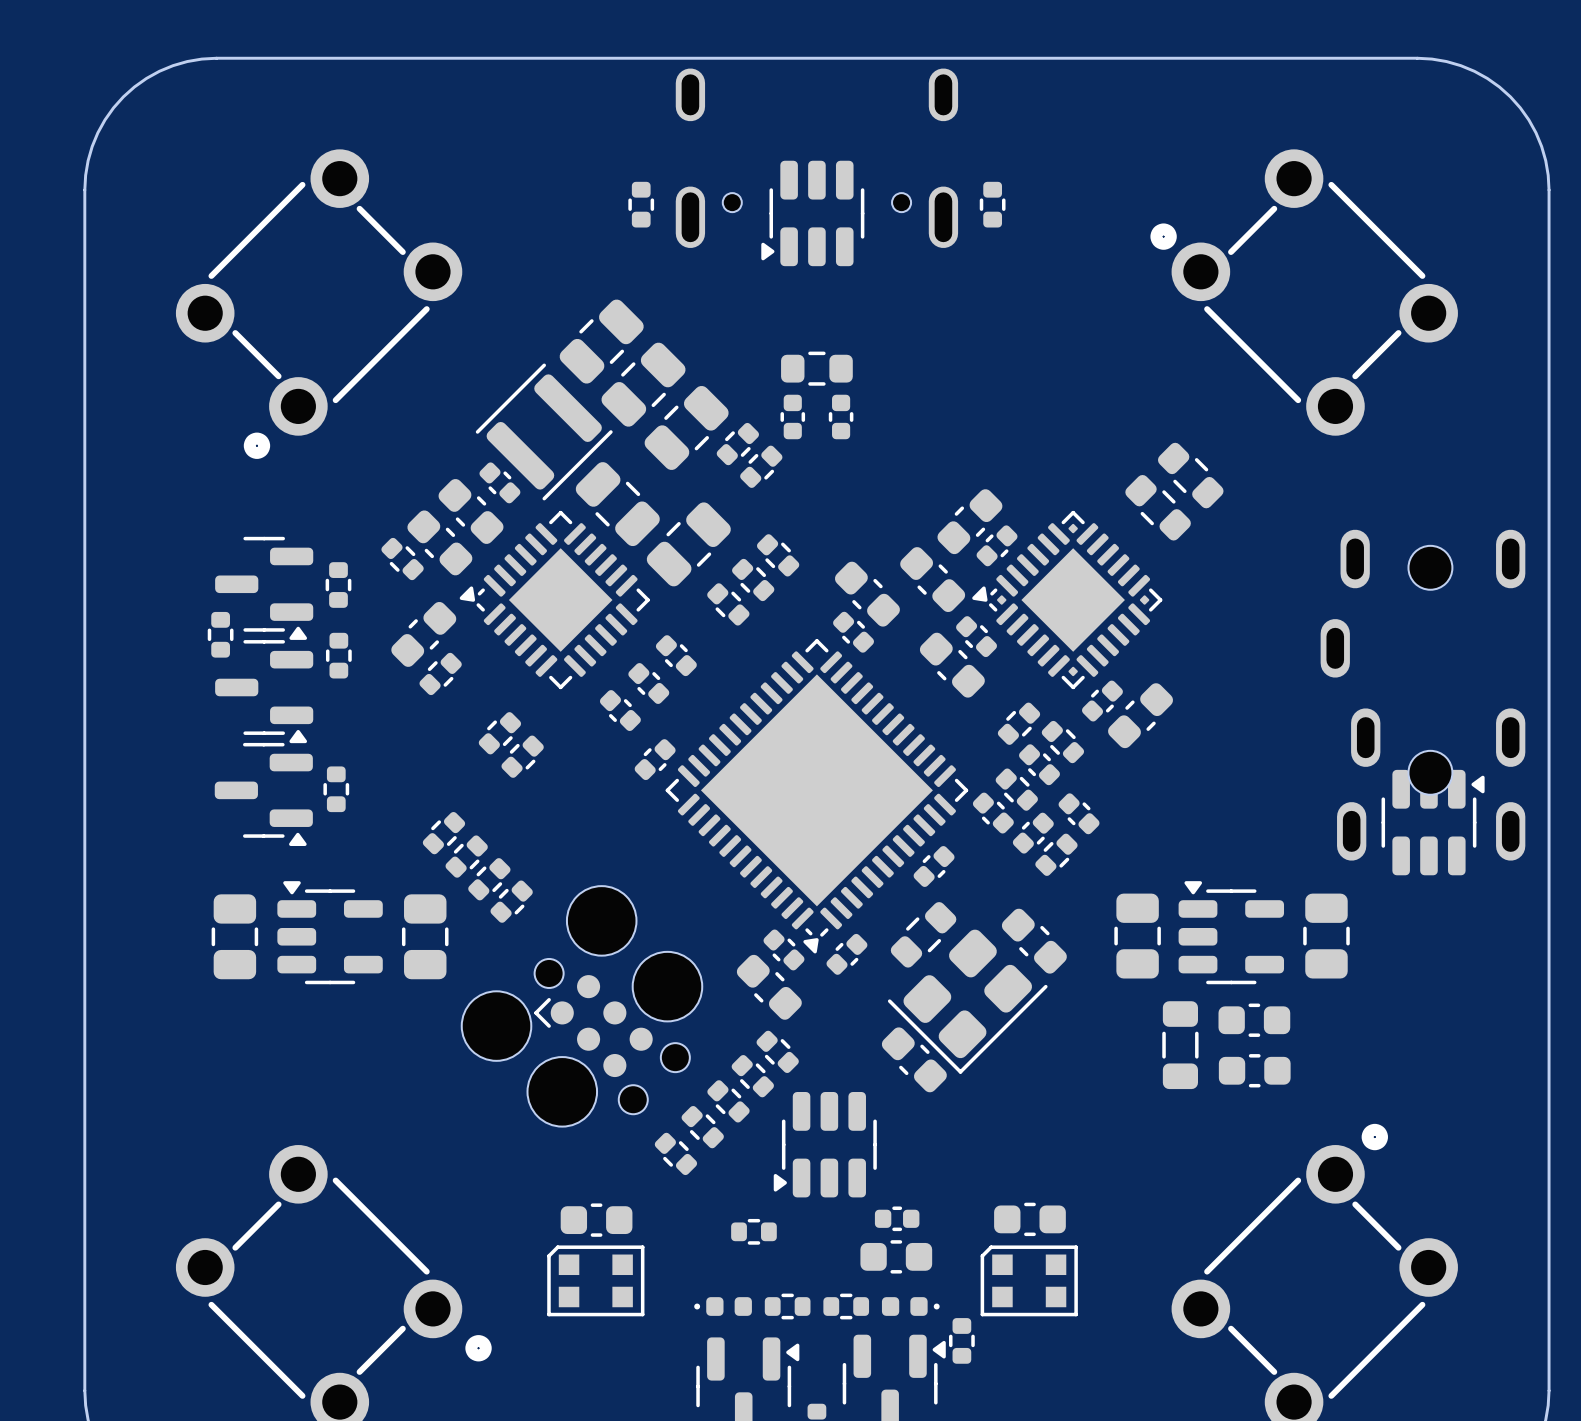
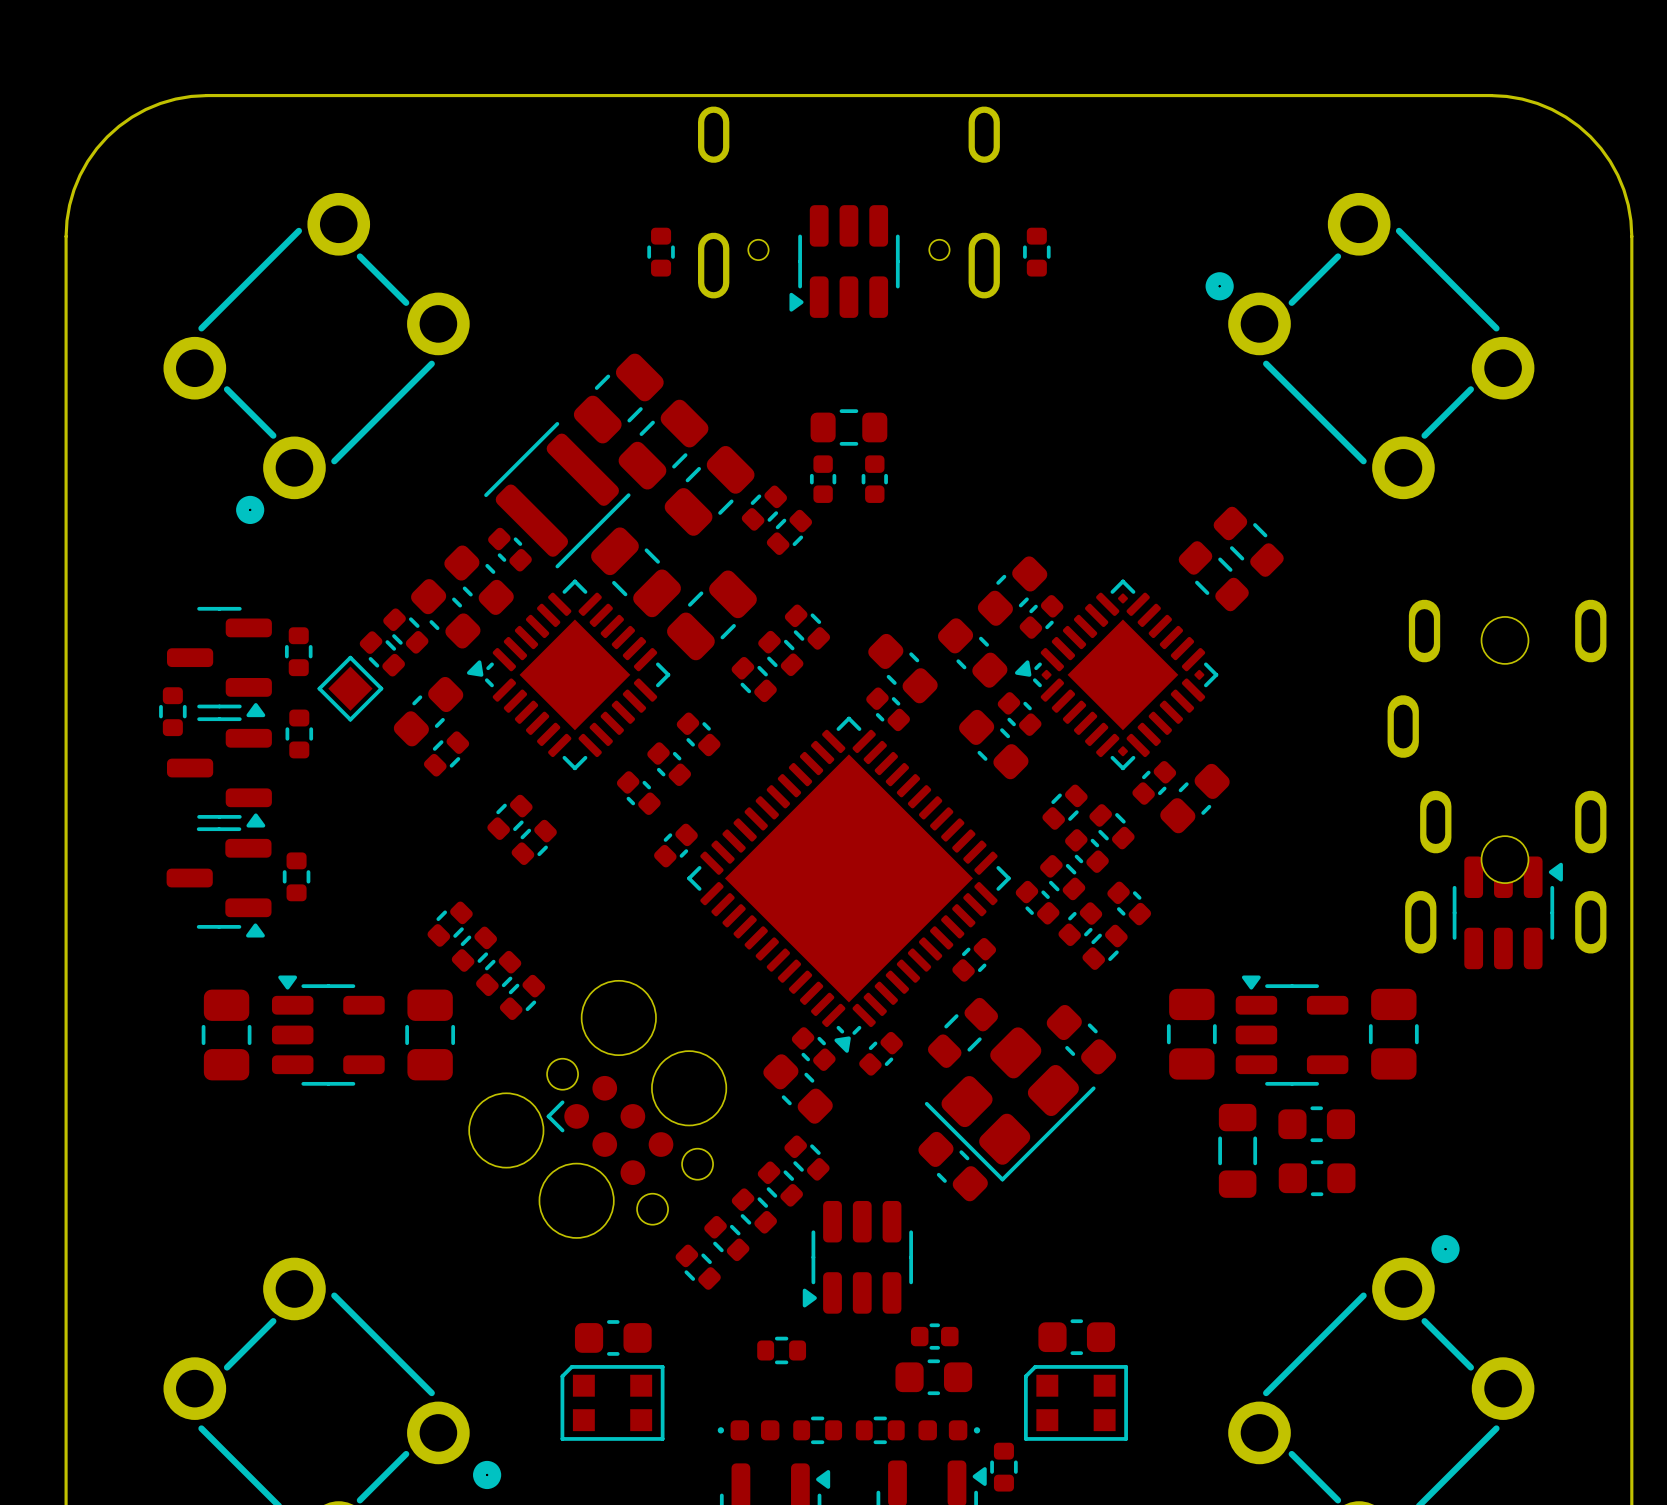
part: none -> (382, 653)
part position: (338, 585) -> (298, 651)
part position: (264, 588) -> (219, 662)
part: none -> (350, 688)
part position: (220, 634) -> (172, 711)
part position: (338, 655) -> (299, 733)
part position: (264, 691) -> (219, 772)
part position: (336, 789) -> (296, 876)
part position: (263, 794) -> (219, 882)

